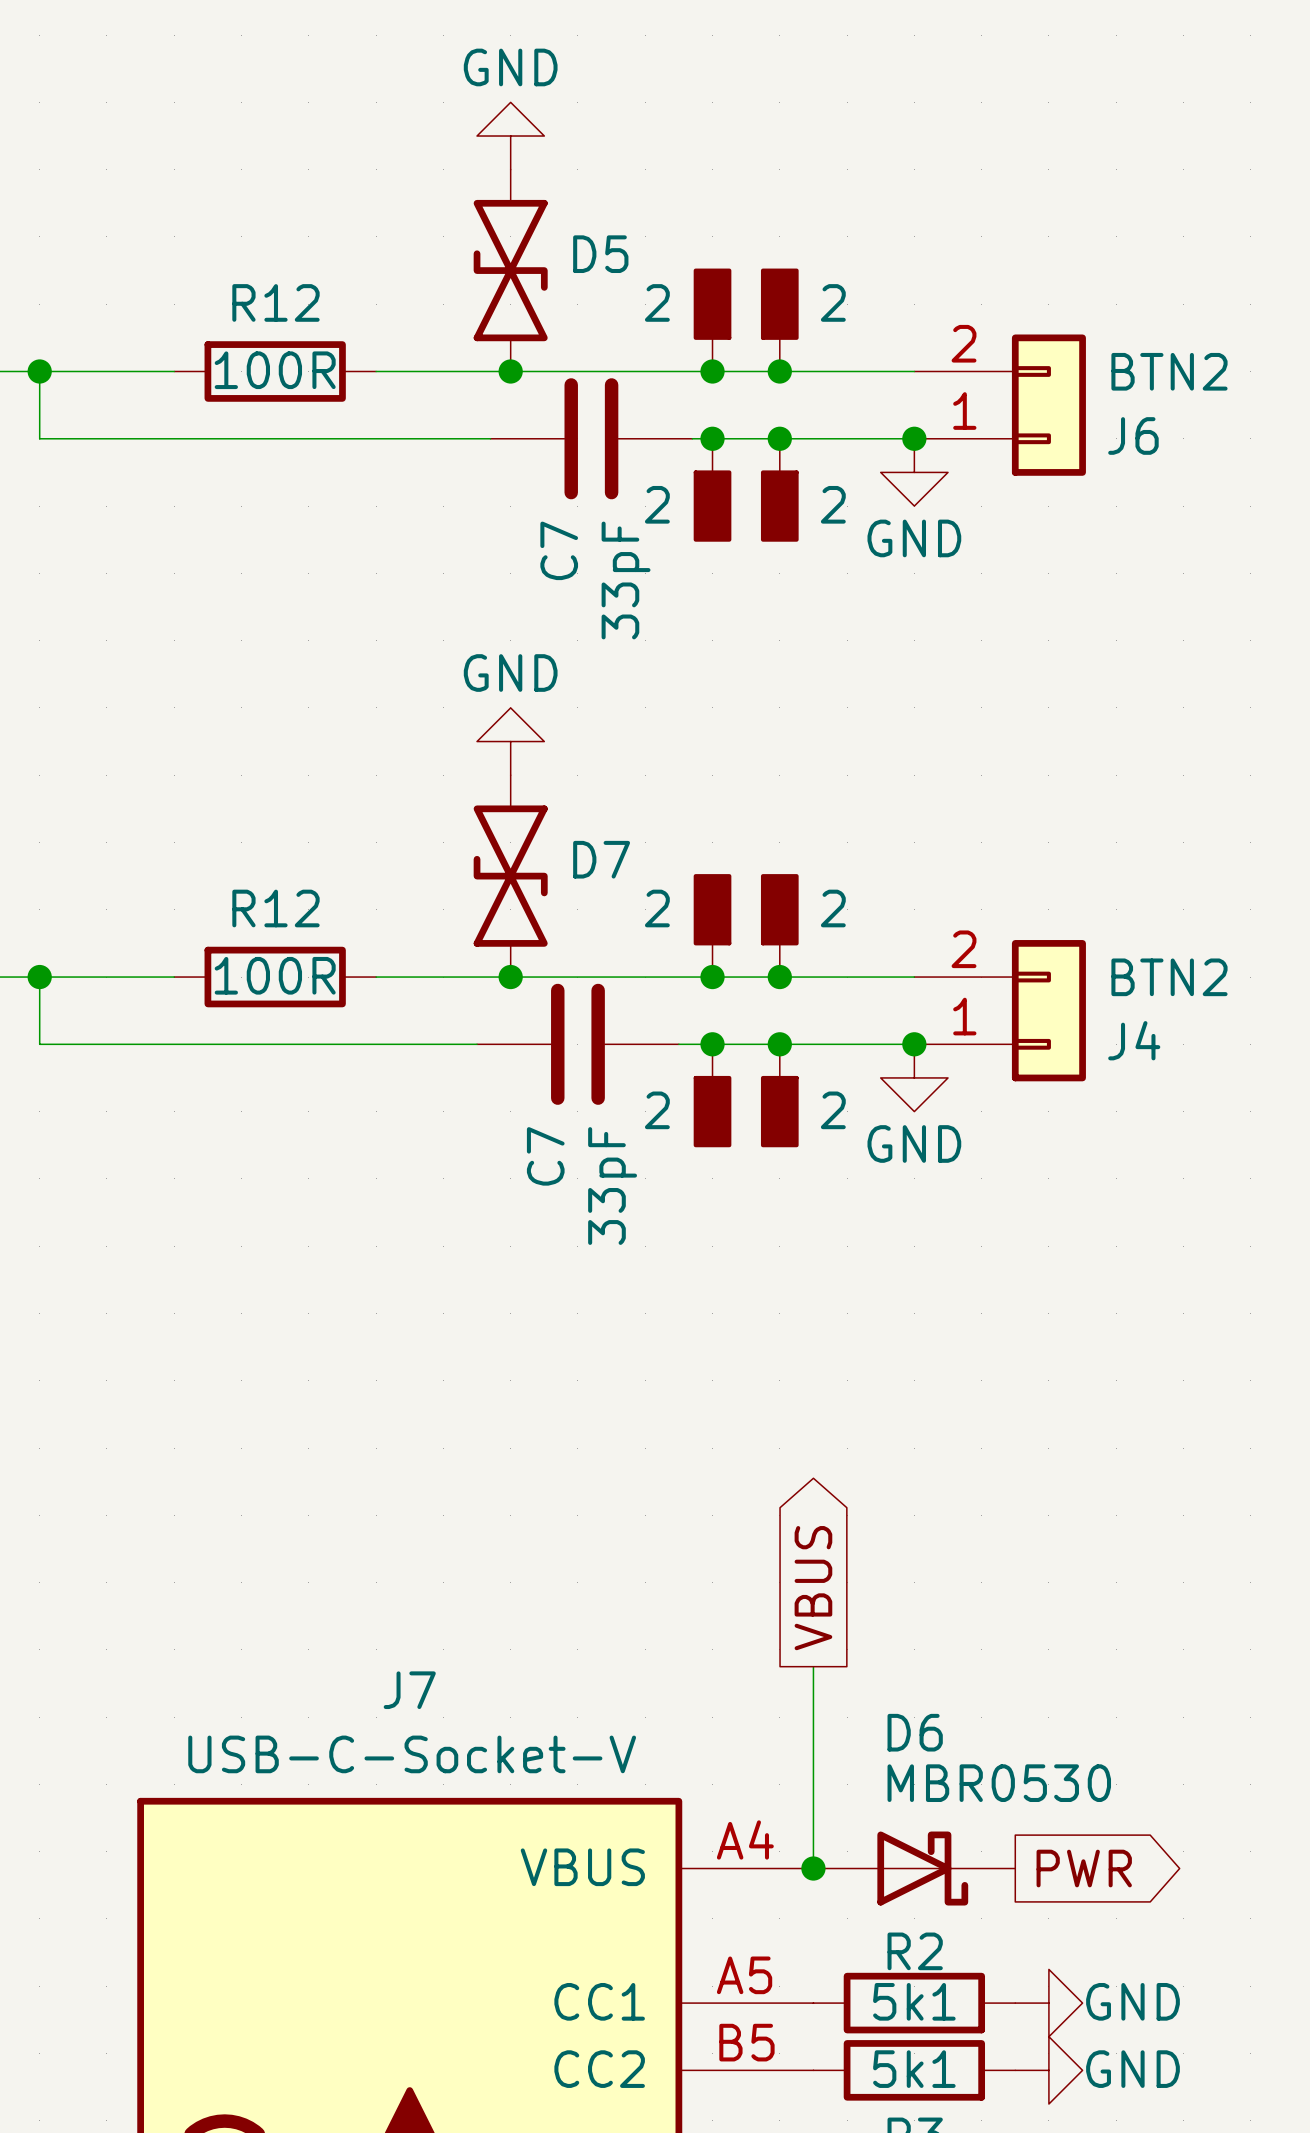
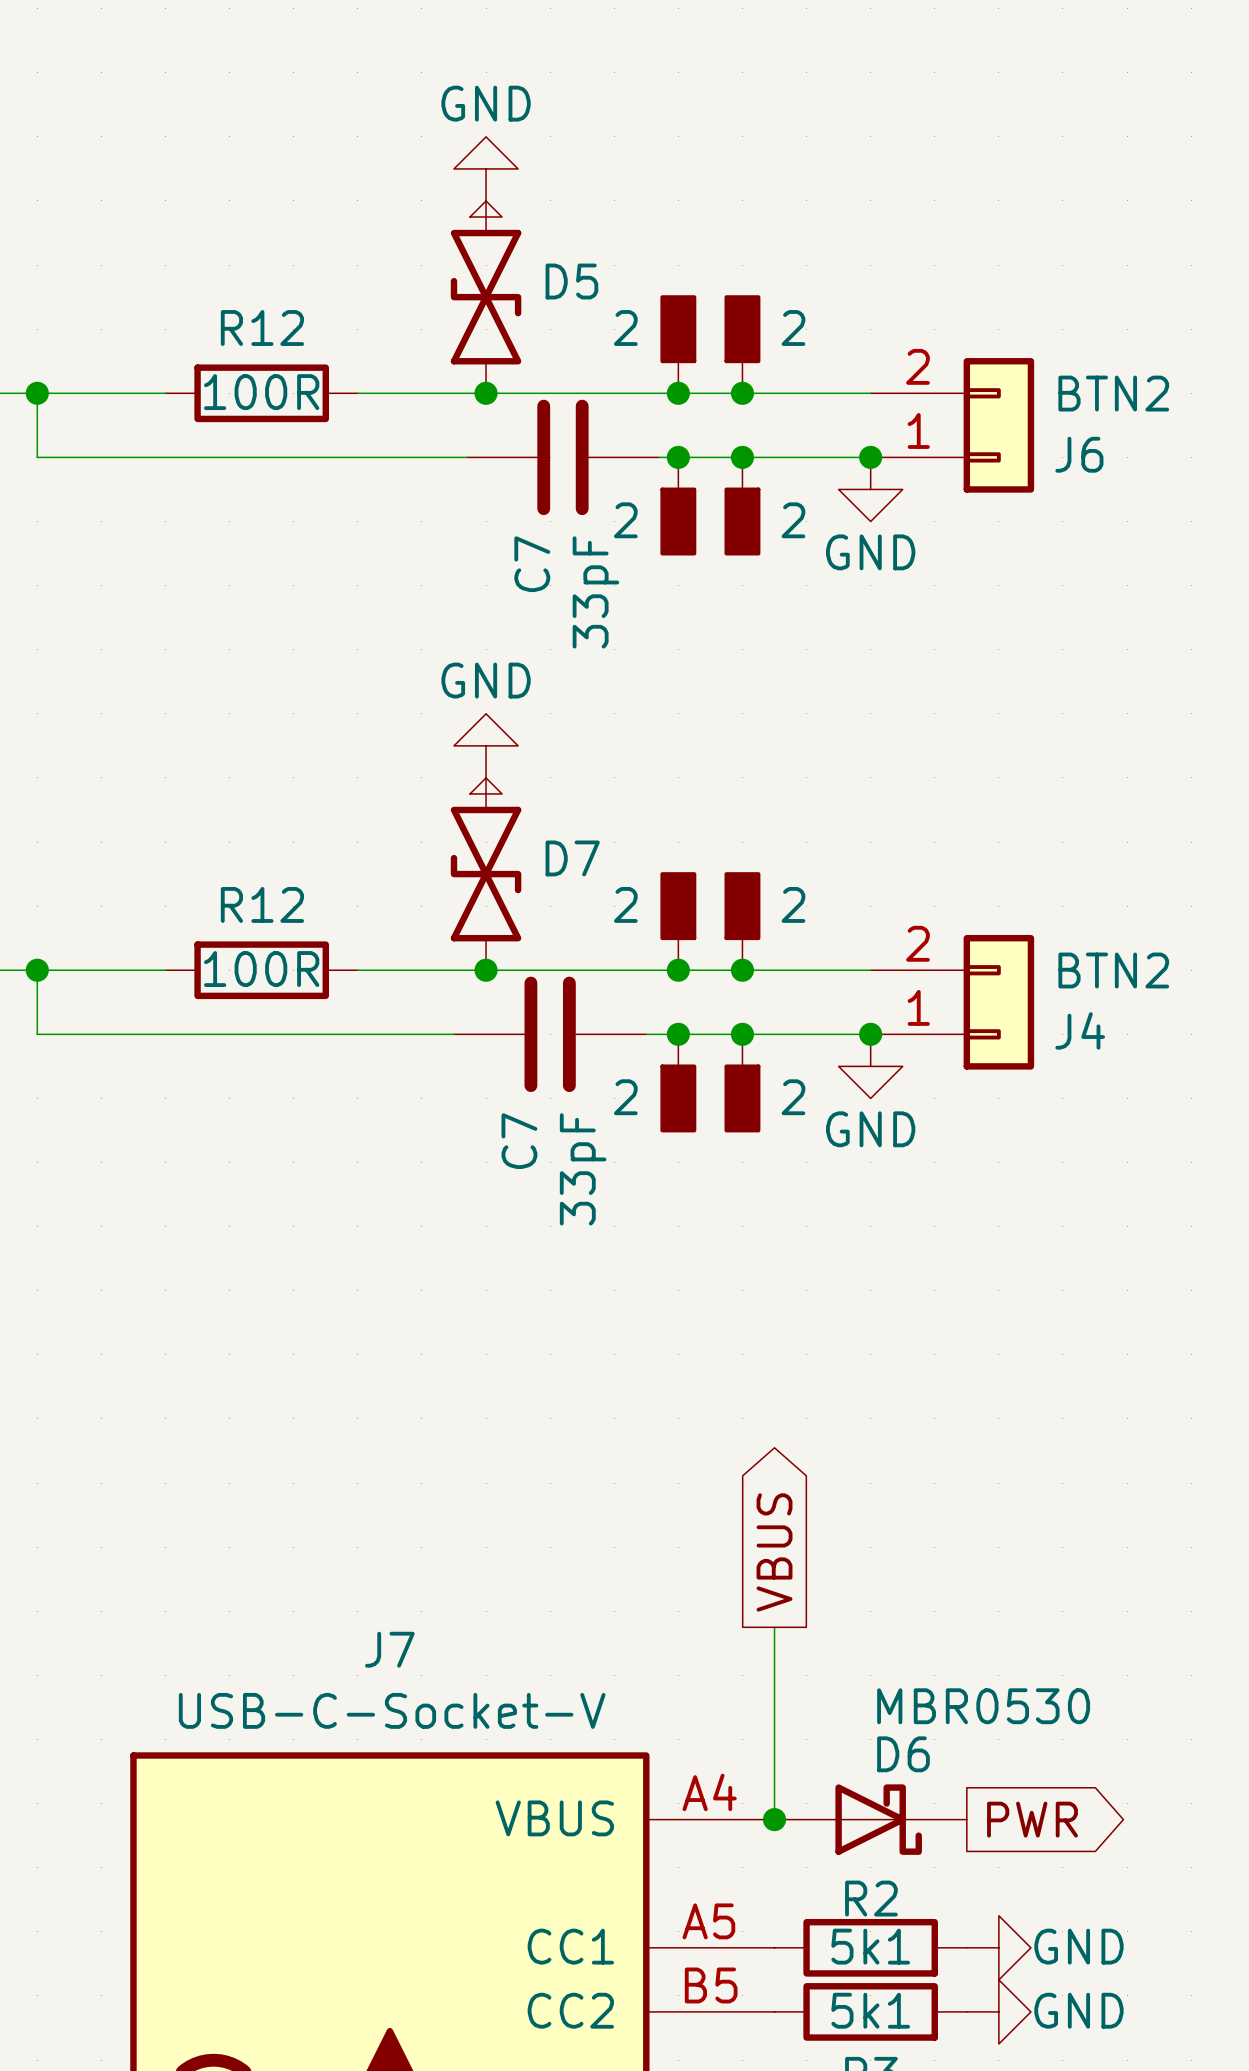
D5 symbol: [473, 169, 548, 372] -> [450, 200, 522, 394]
D7 symbol: [473, 775, 548, 978] -> [450, 777, 522, 971]
D6 name position: D6 (915, 1732) -> D6 (903, 1754)
D6 value position: MBR0530 (999, 1783) -> MBR0530 (983, 1706)

